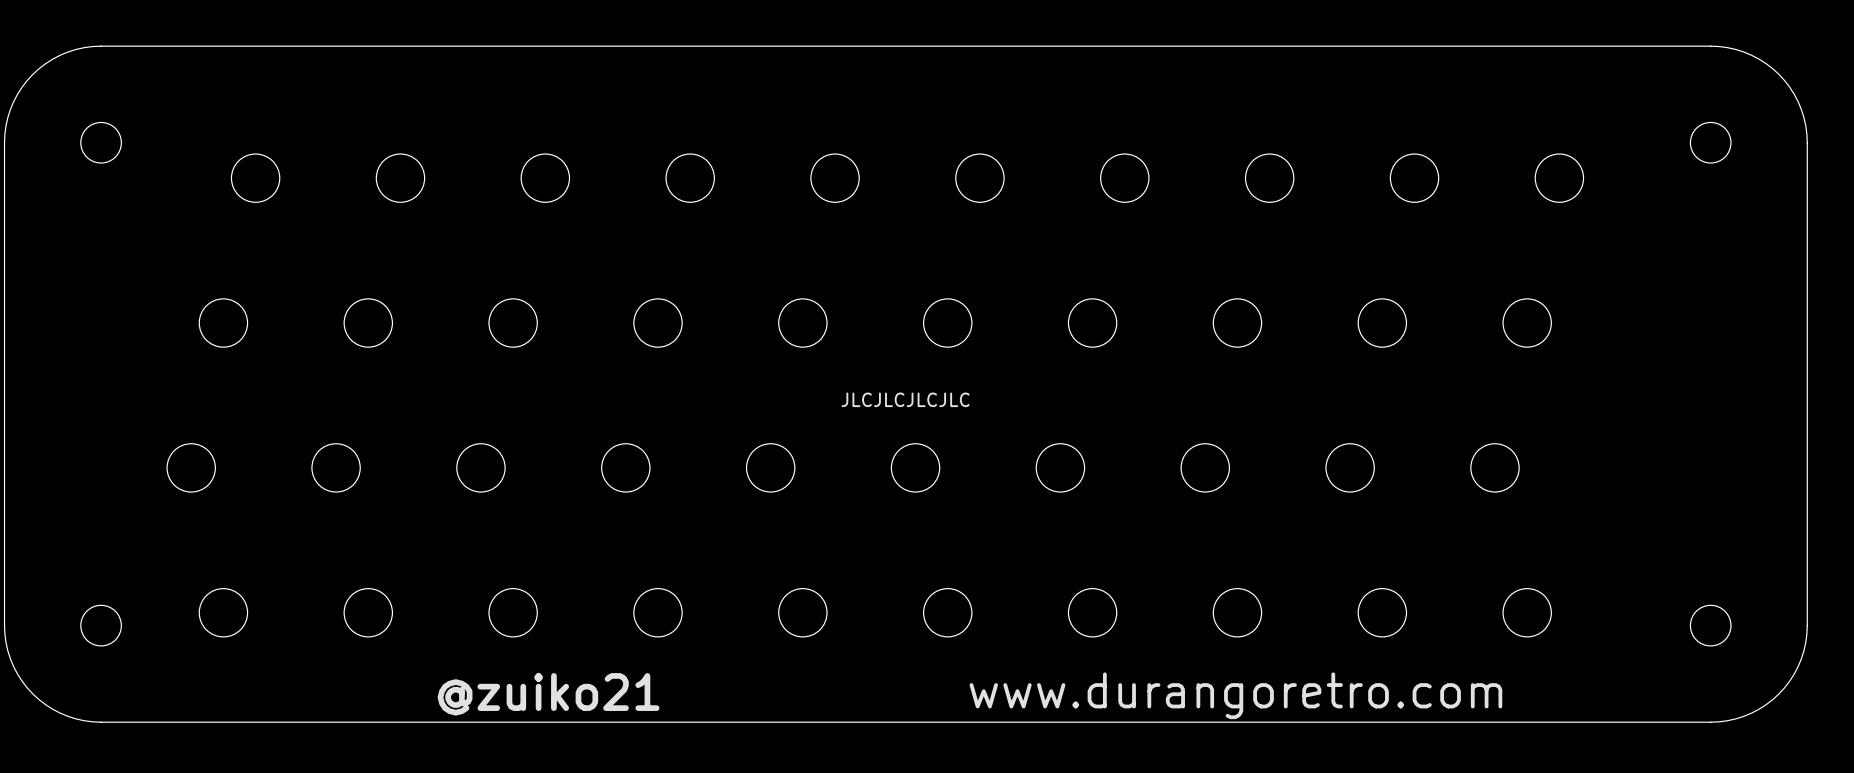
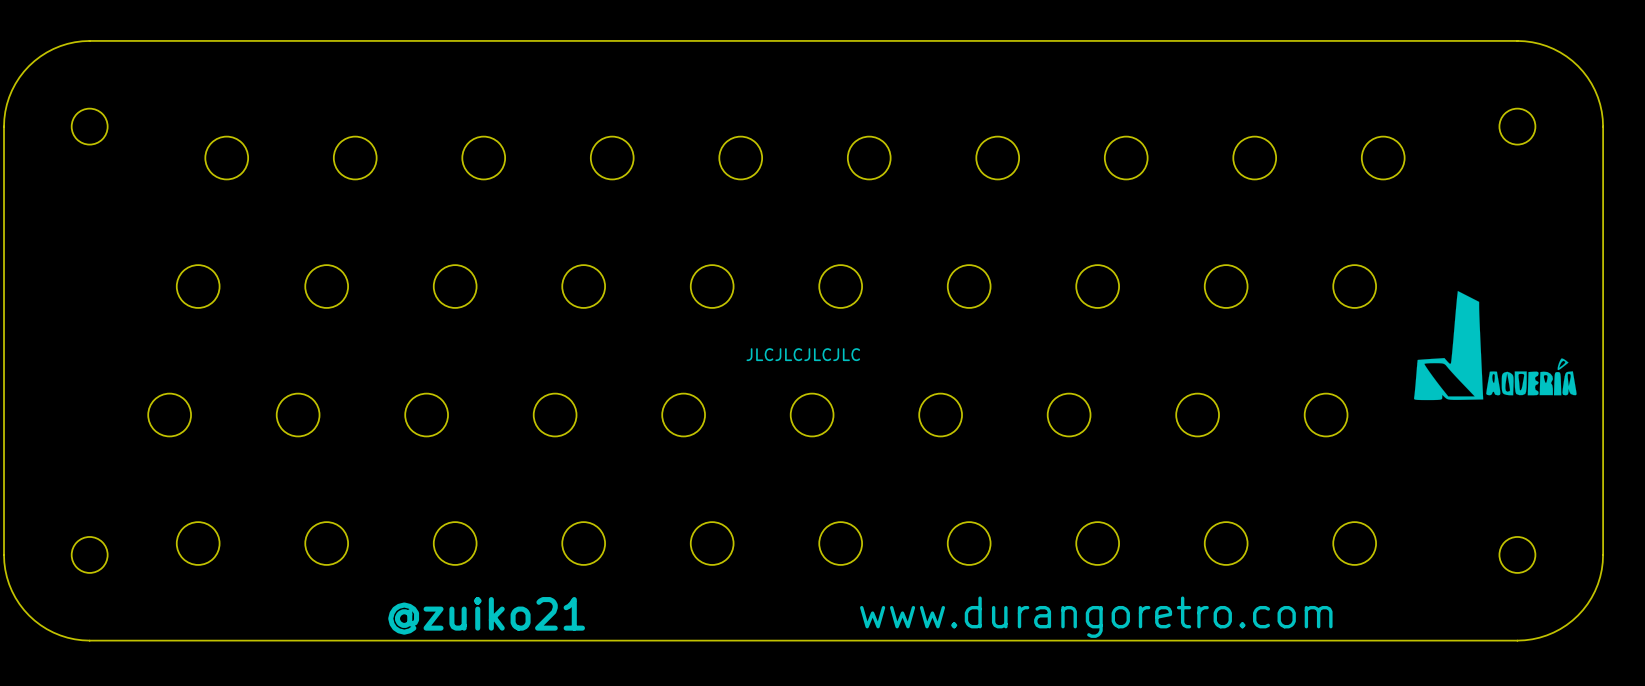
drawing: none -> [1413, 290, 1577, 401]

